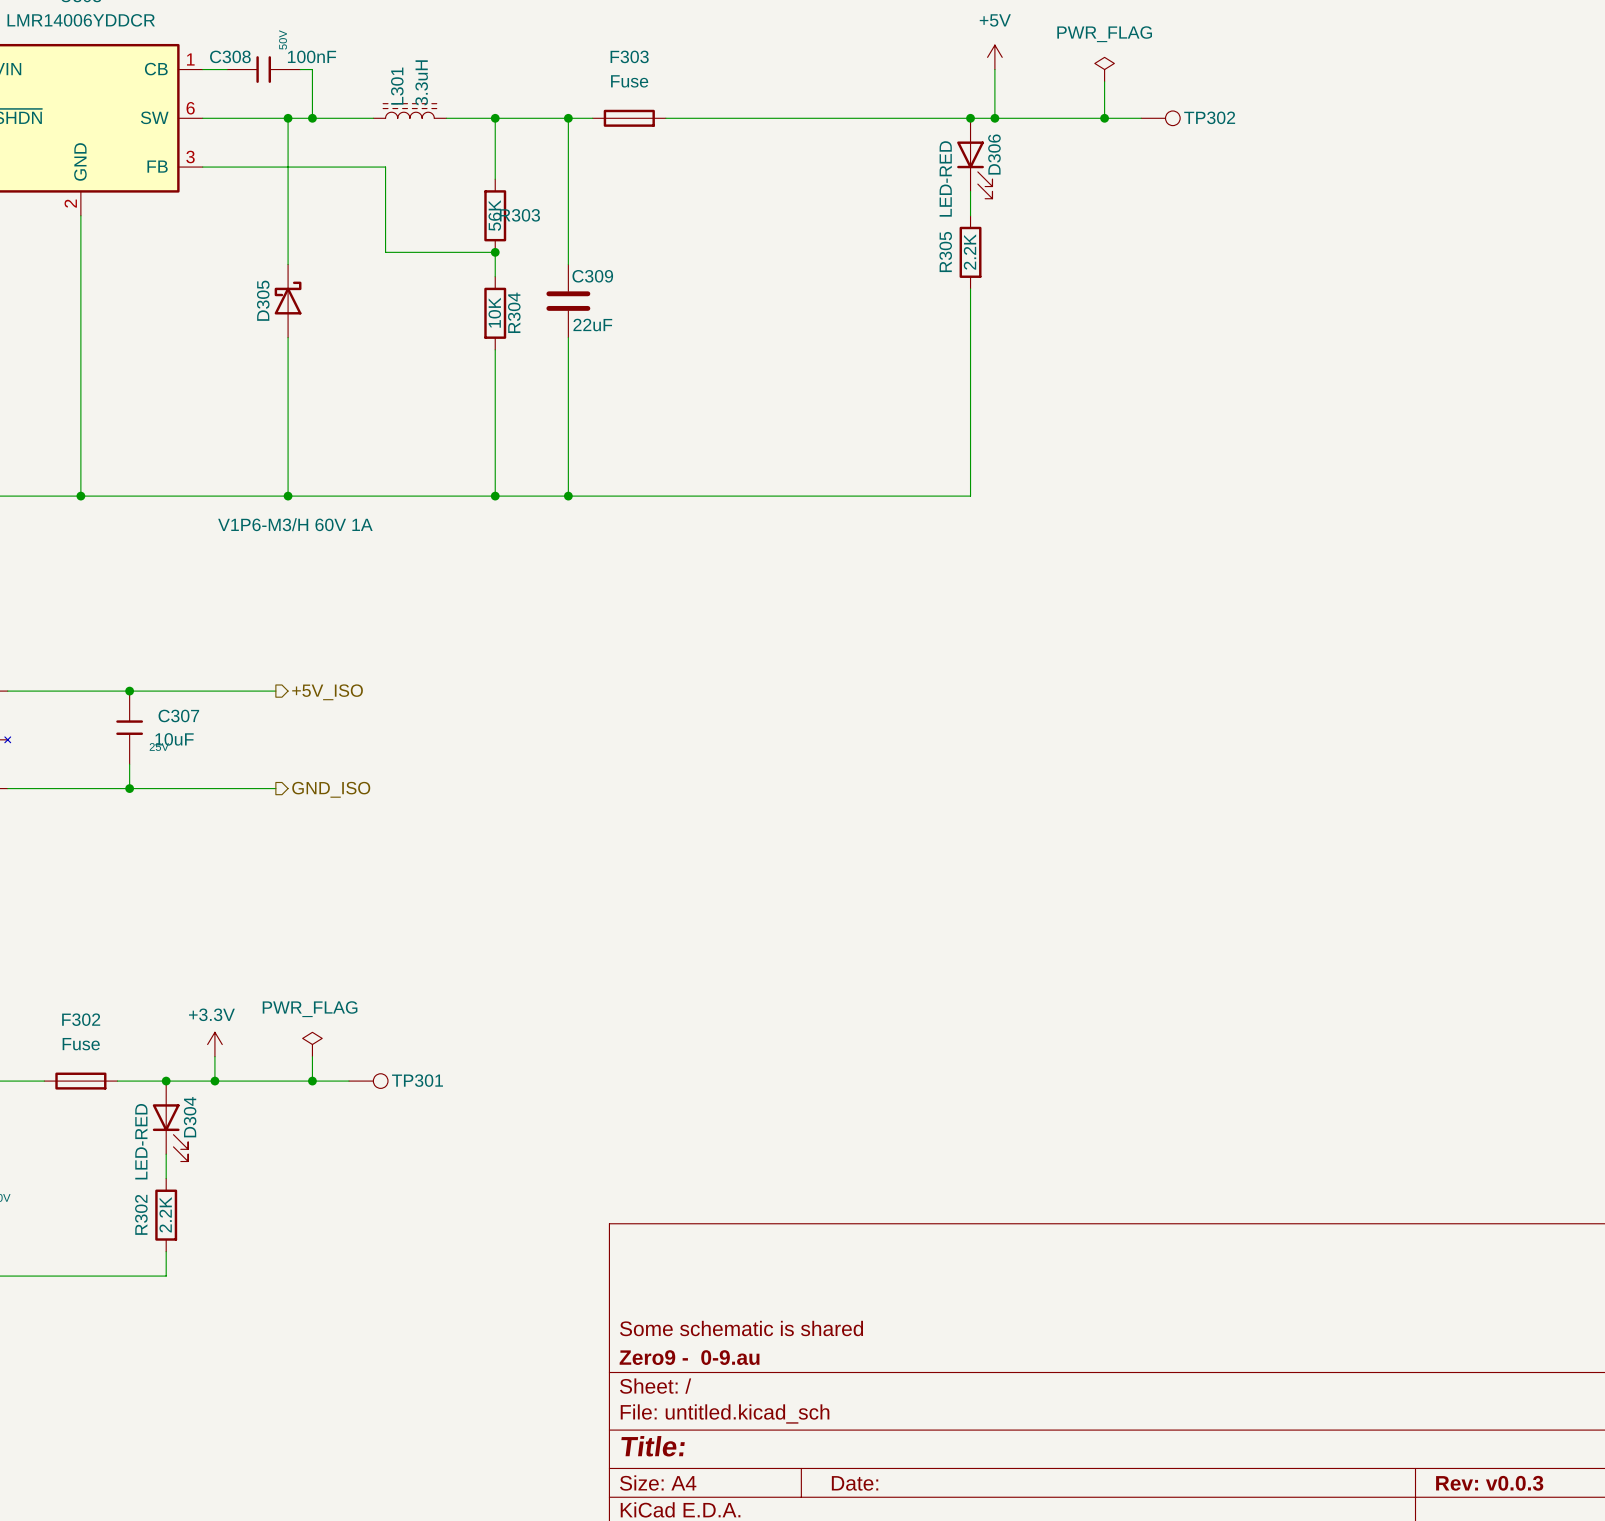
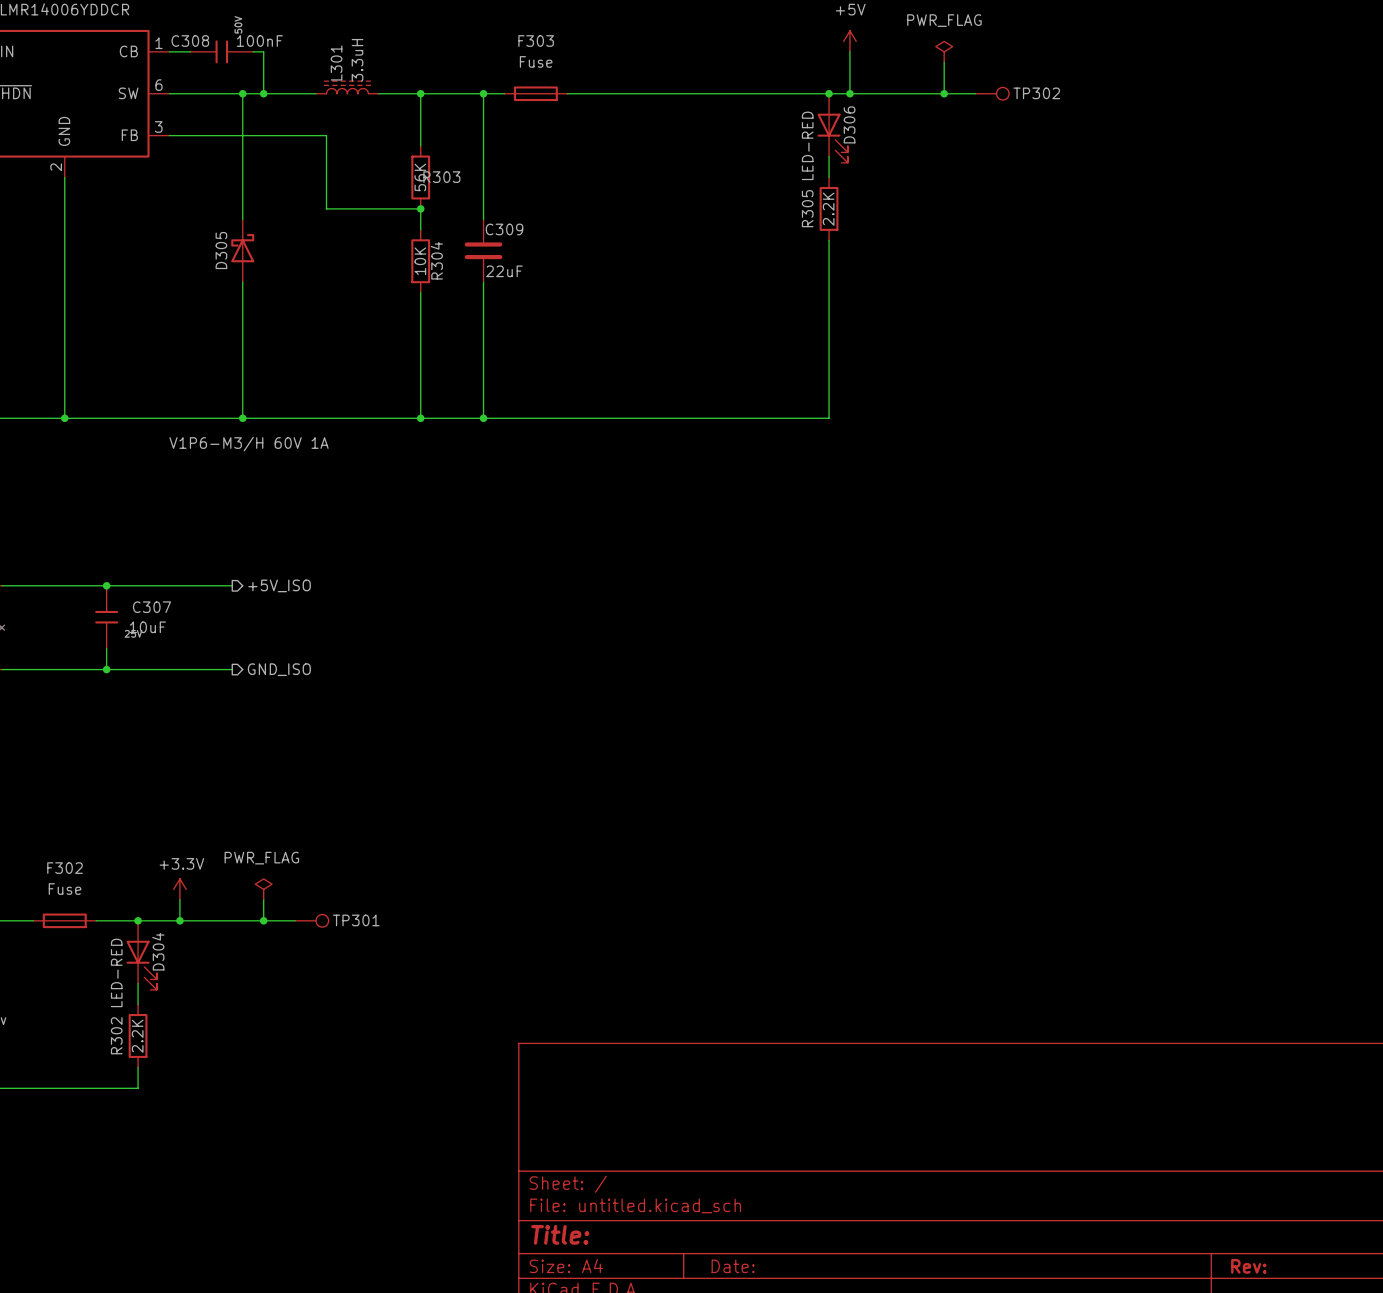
title block: Some schematic is shared (741, 1328) -> none
title block: Zero9 - 0-9.au (689, 1357) -> none
title block: Rev: v0.0.3 (1489, 1483) -> Rev: (1248, 1266)

